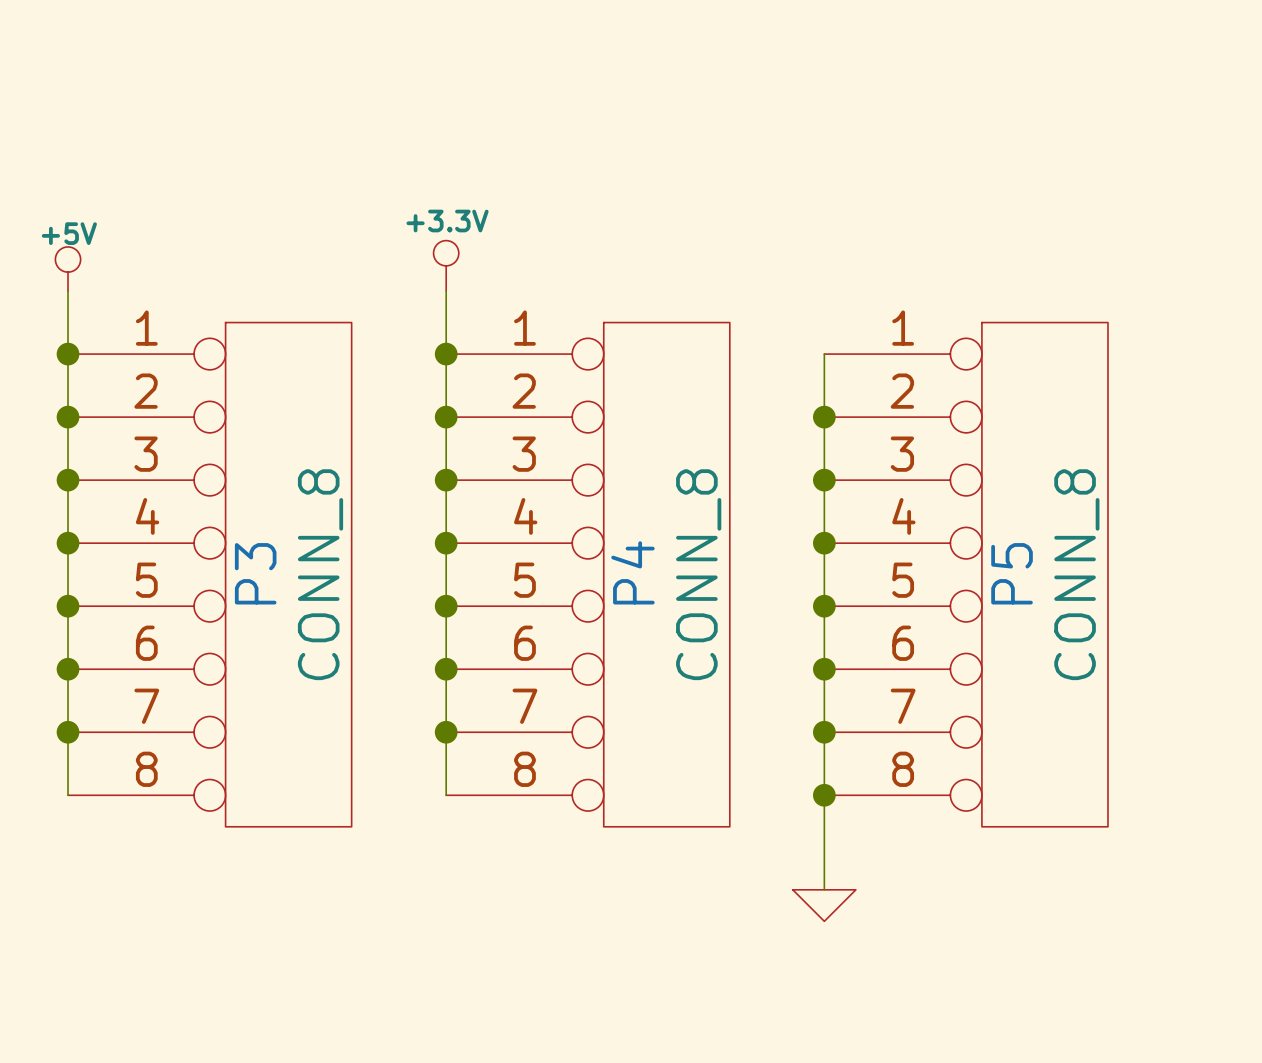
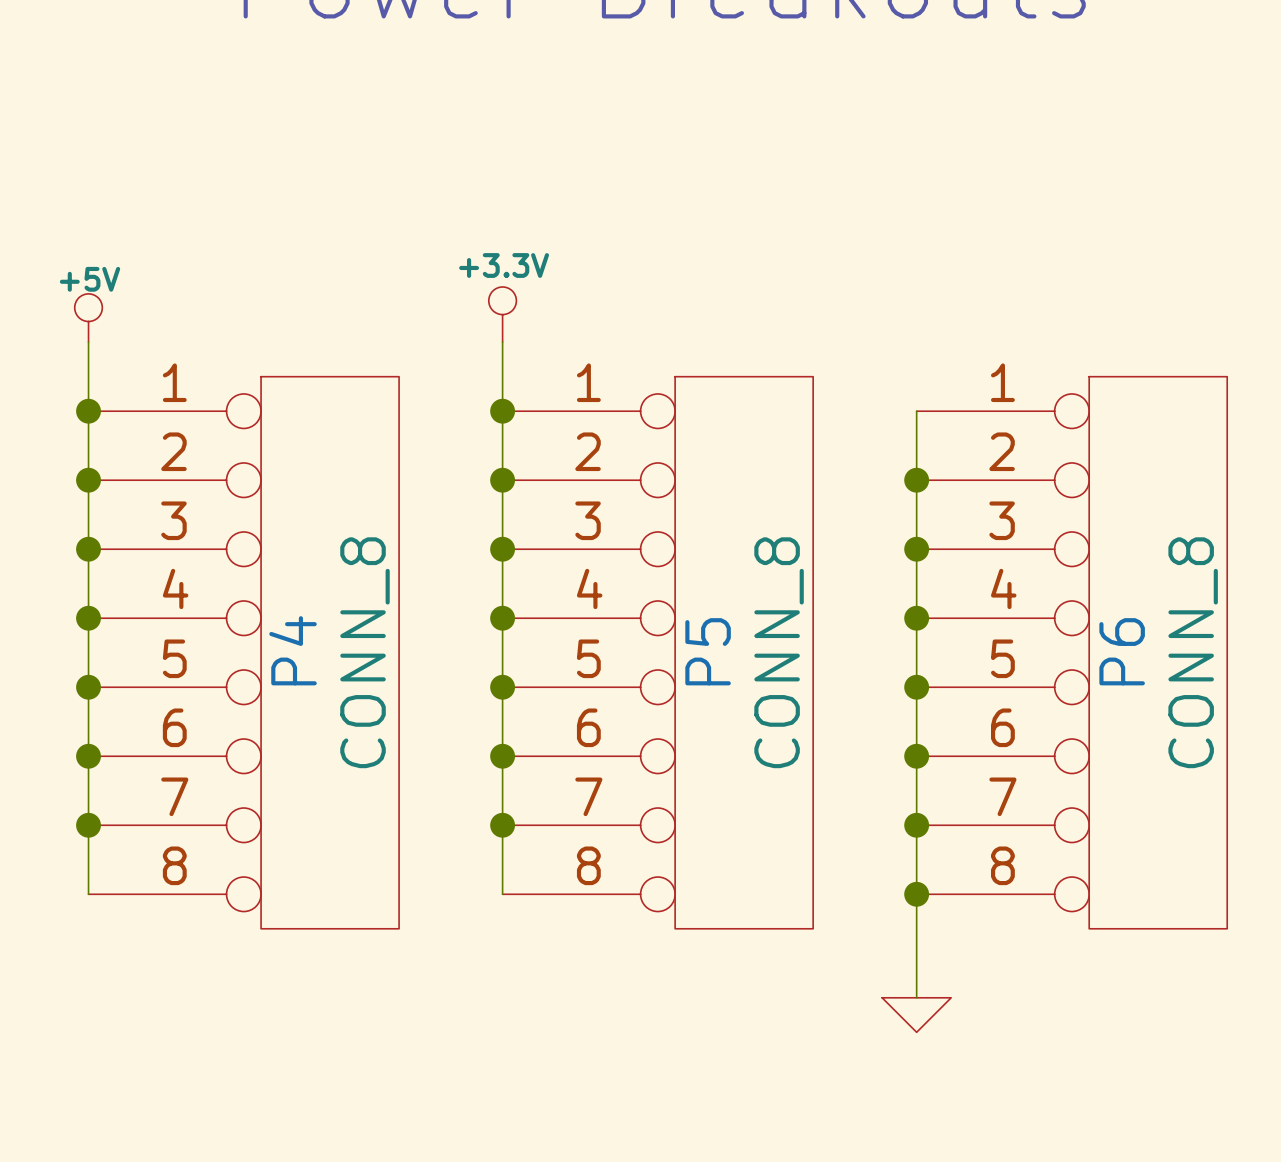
P4 name: P4 (632, 572) -> P5 (708, 651)
P3 name: P3 (255, 573) -> P4 (293, 650)
P5 name: P5 (1012, 573) -> P6 (1122, 651)

